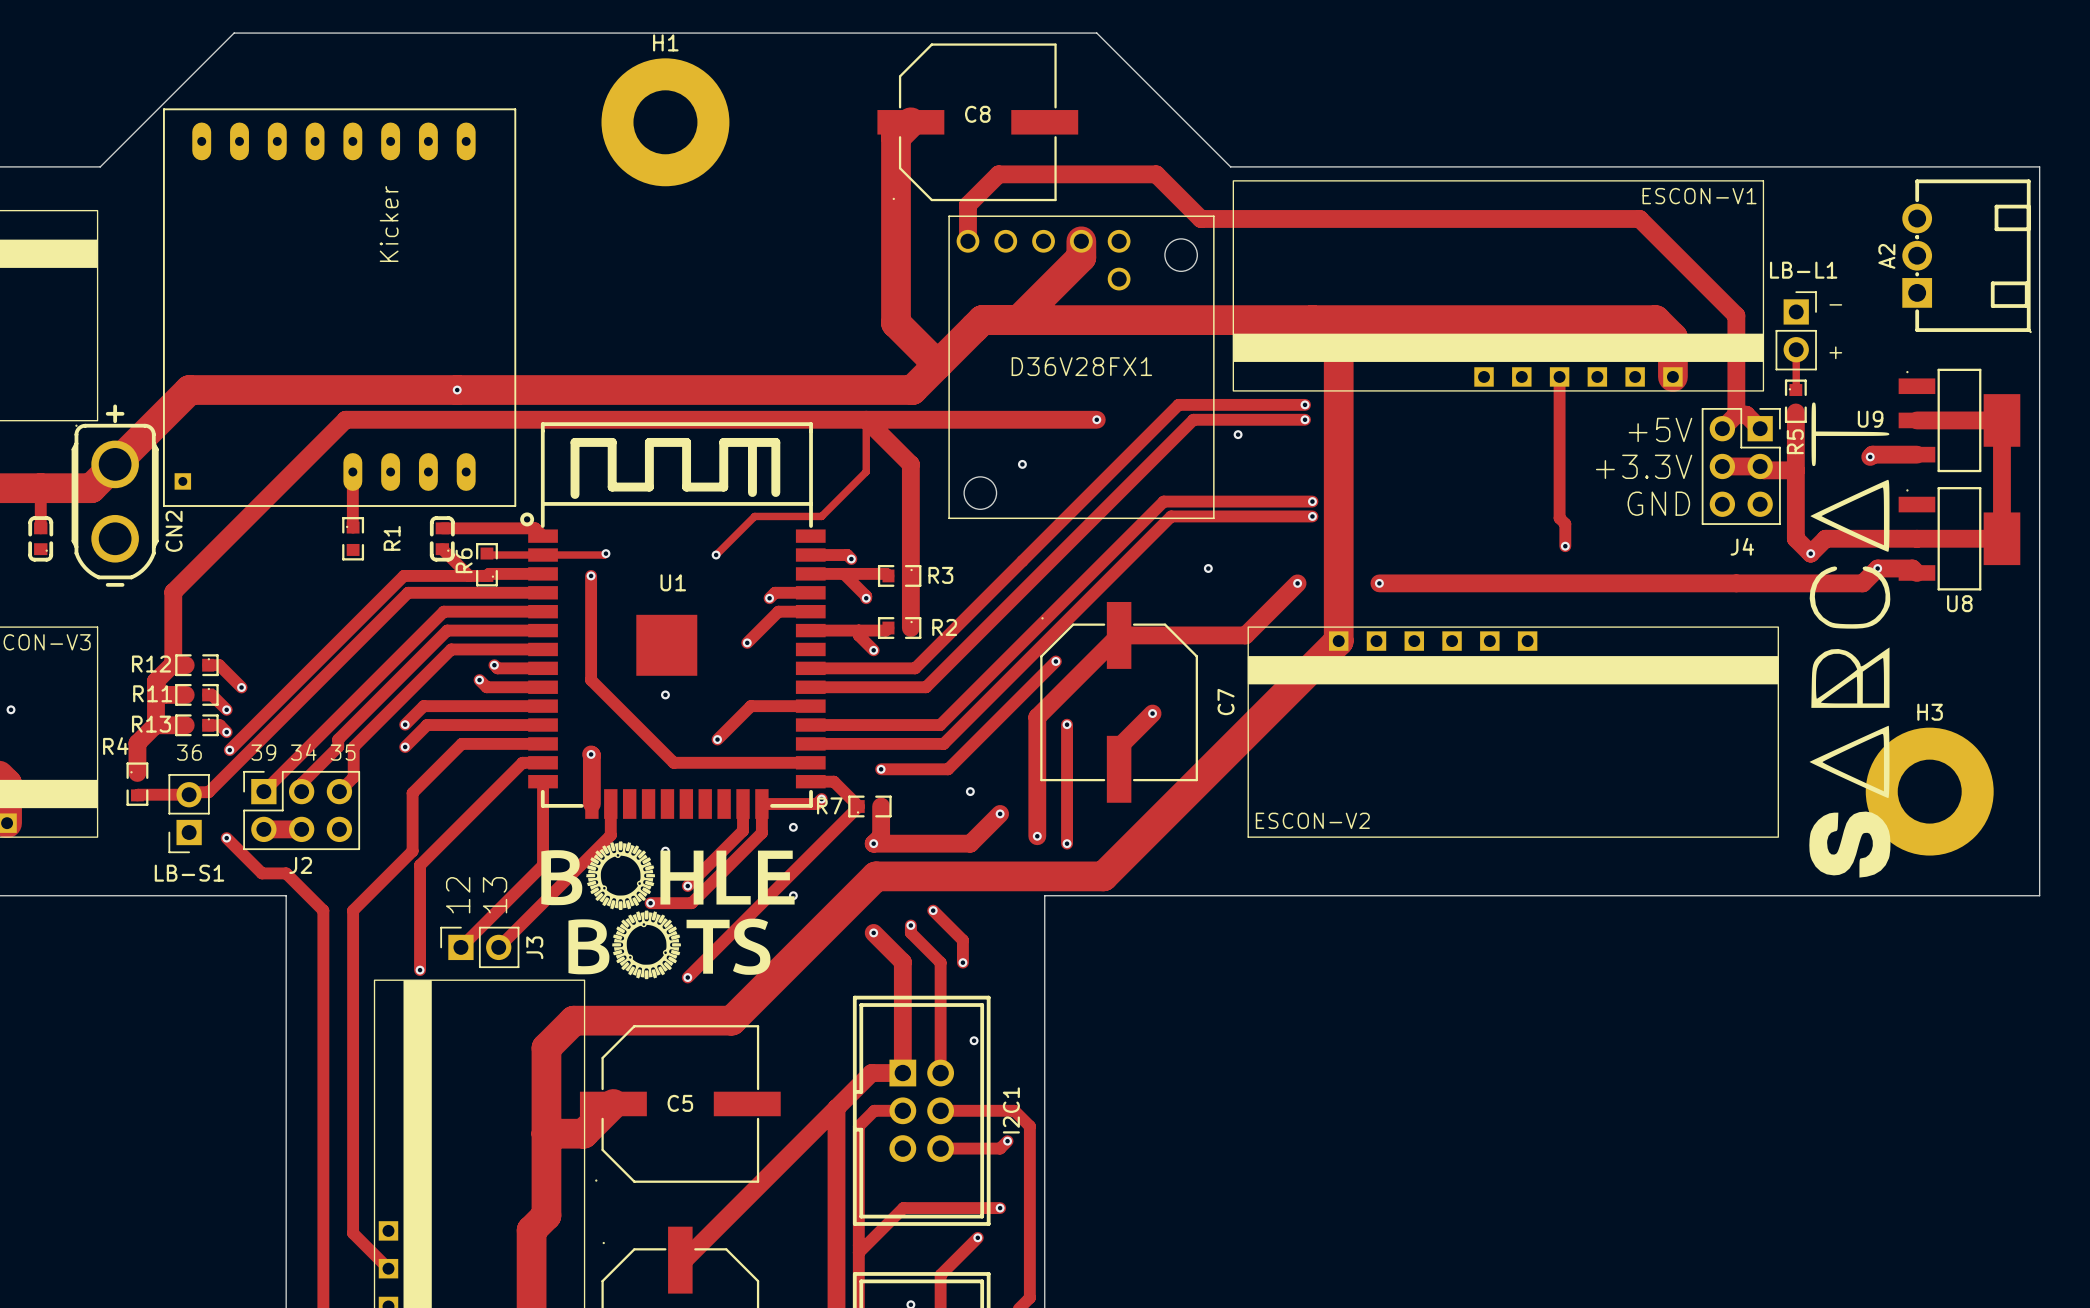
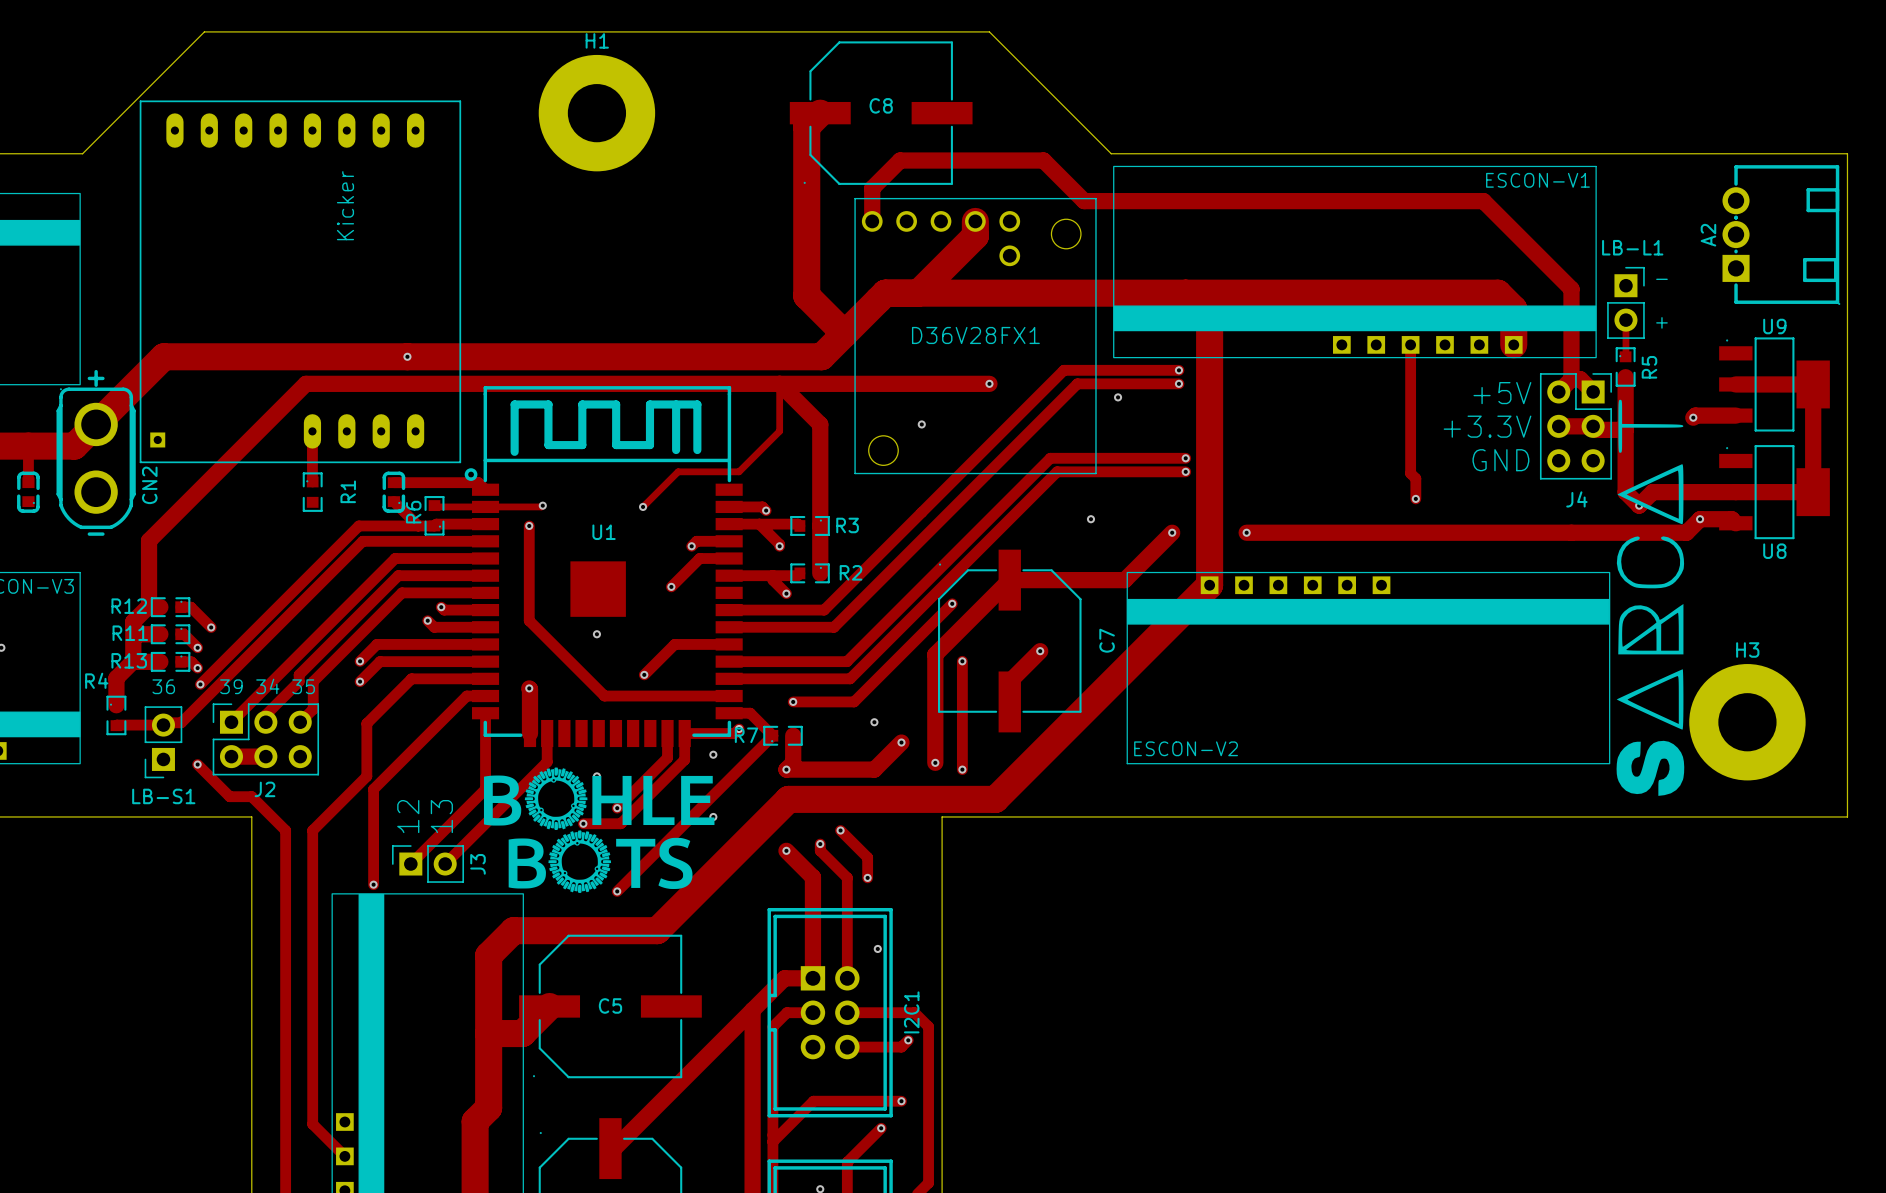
drawing: [1809, 402, 1891, 878] -> none
U9 name position: U9 (1870, 419) -> U9 (1774, 326)
drawing: none -> [1616, 399, 1685, 796]
R5 name position: R5 (1795, 441) -> R5 (1649, 367)

